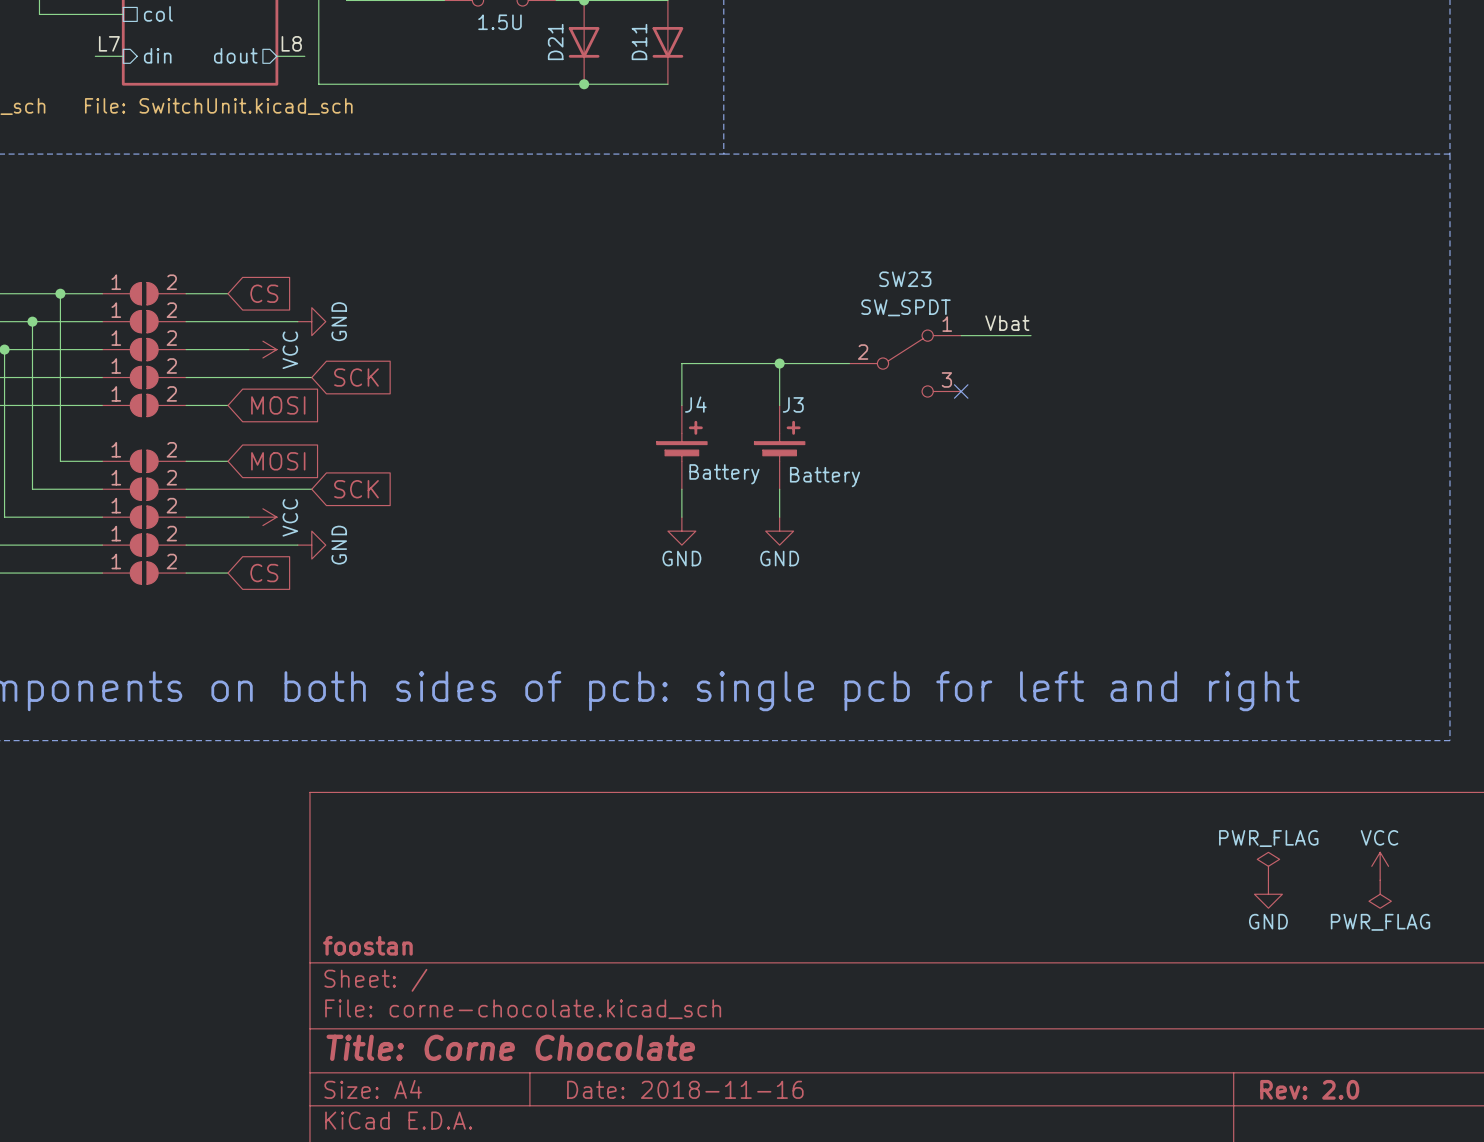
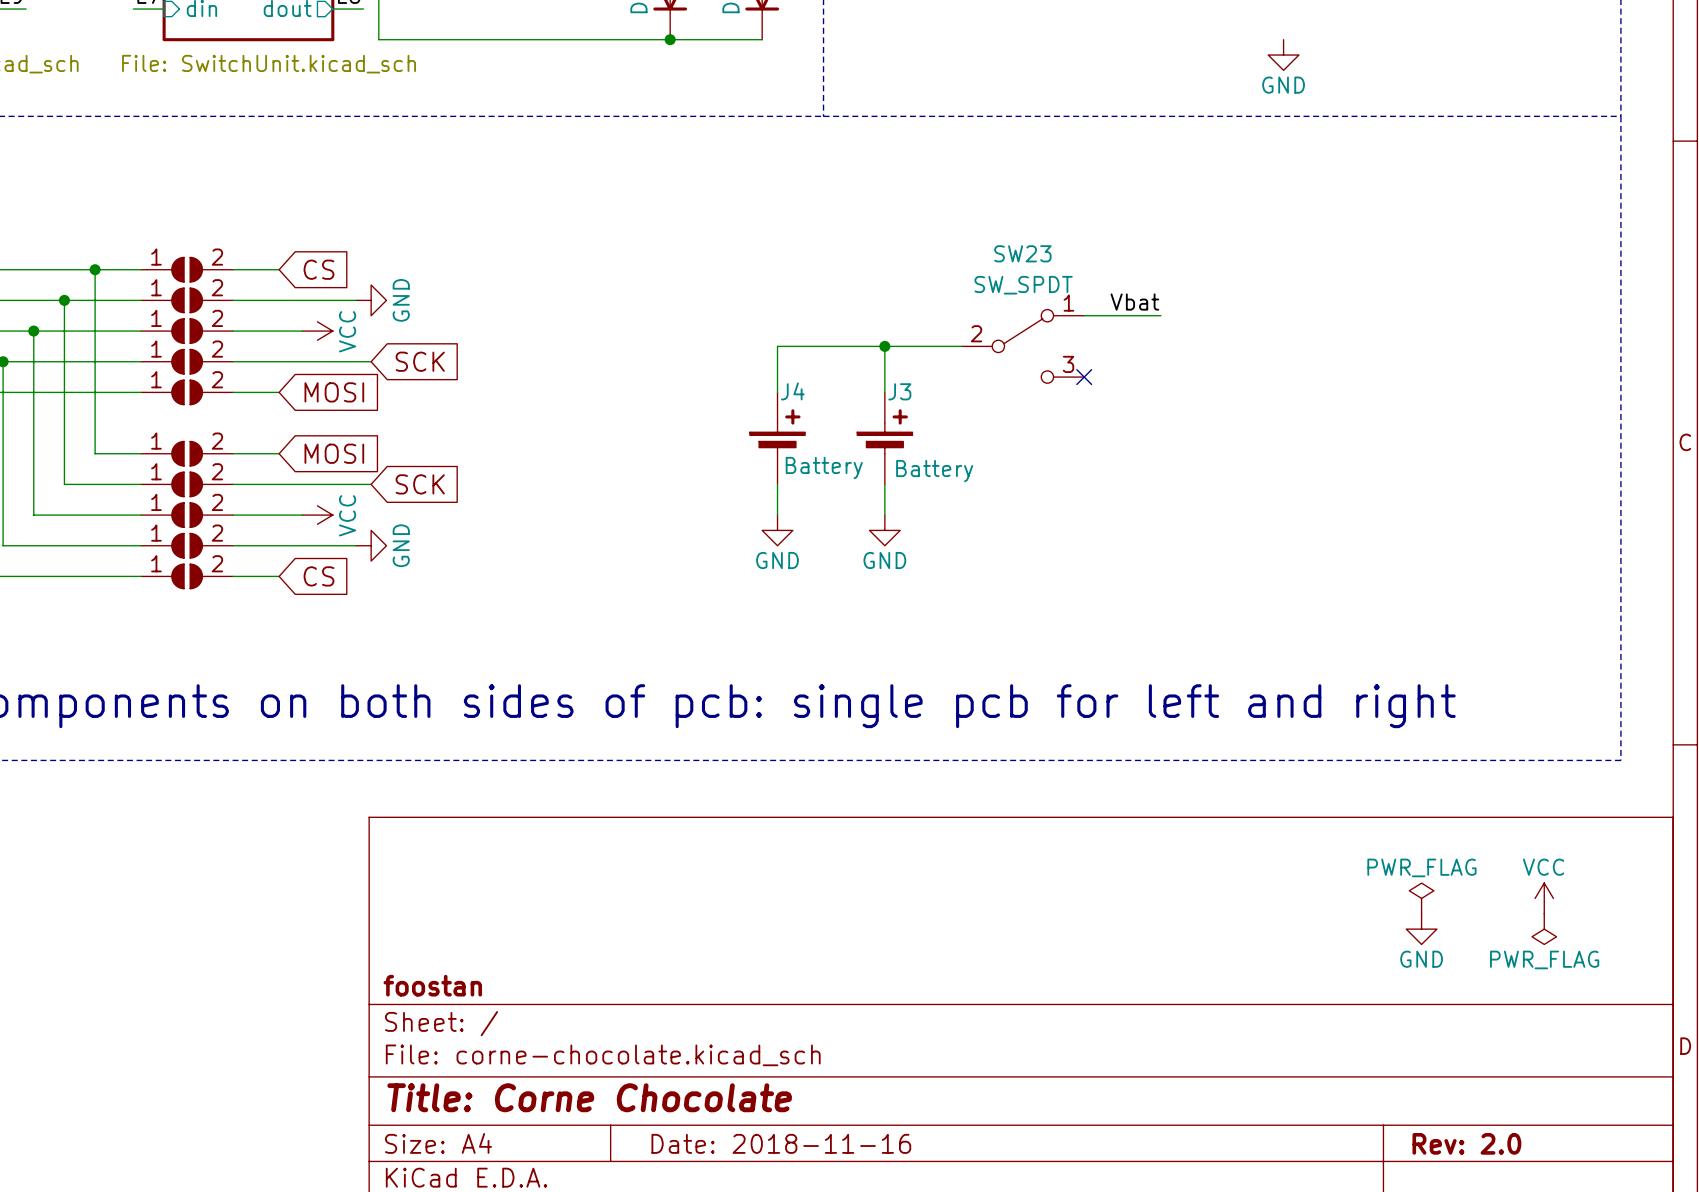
power symbol: none -> GND (1283, 55)

